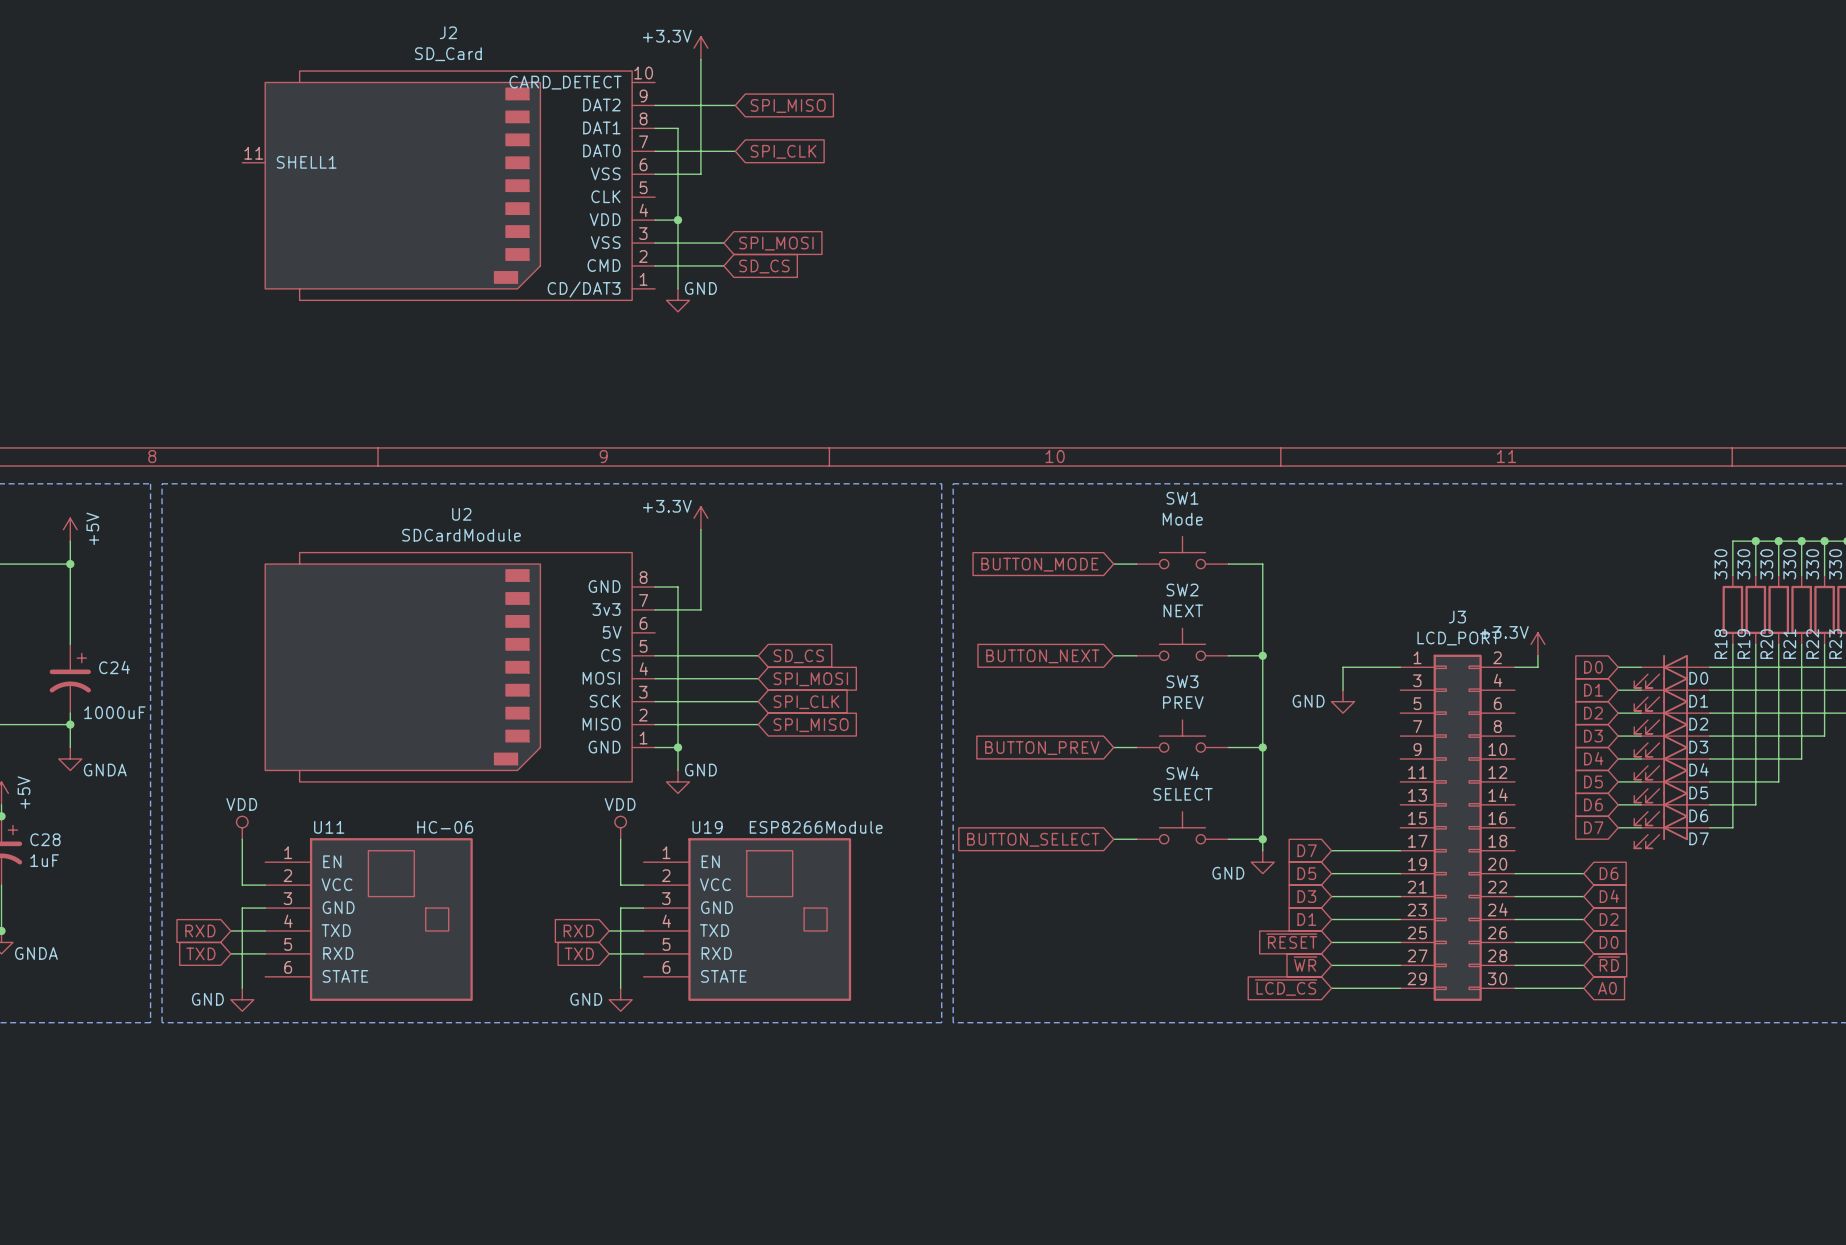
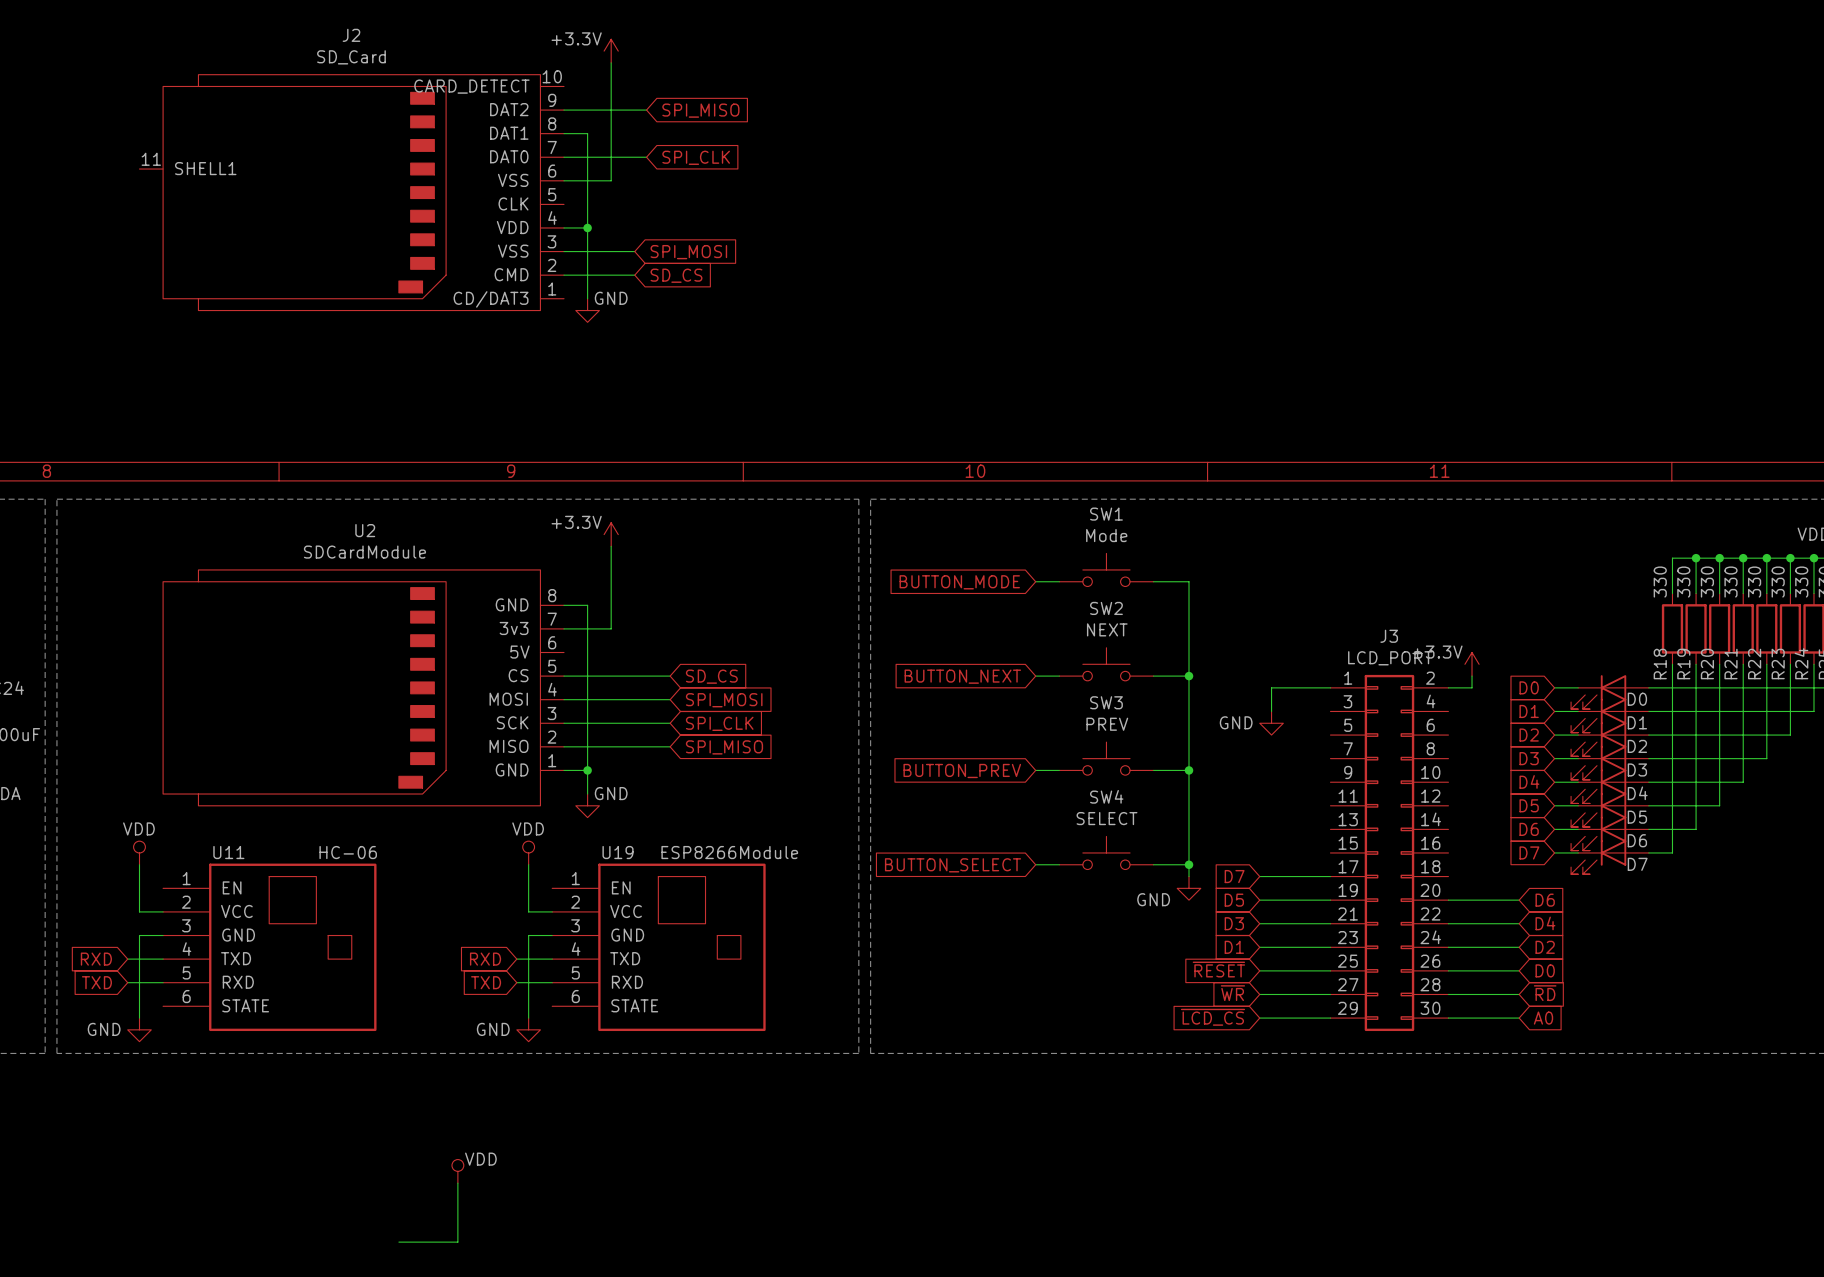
power symbol: none -> VDD (457, 1171)
wire: none -> (457, 1183) (457, 1242) (398, 1242)

